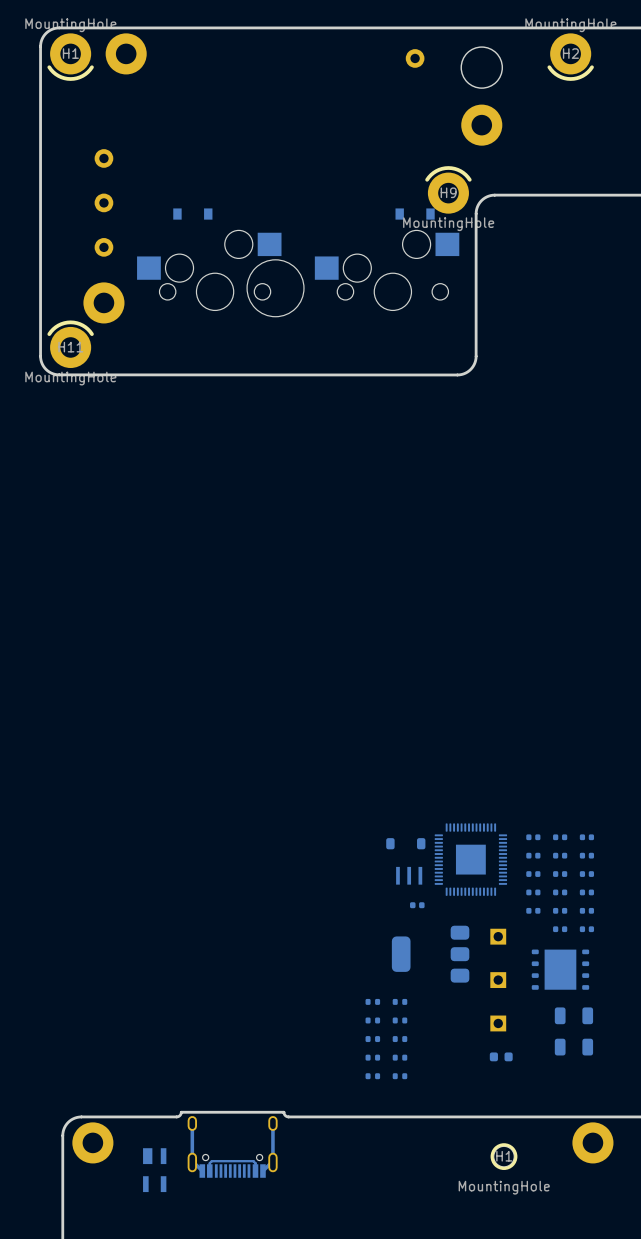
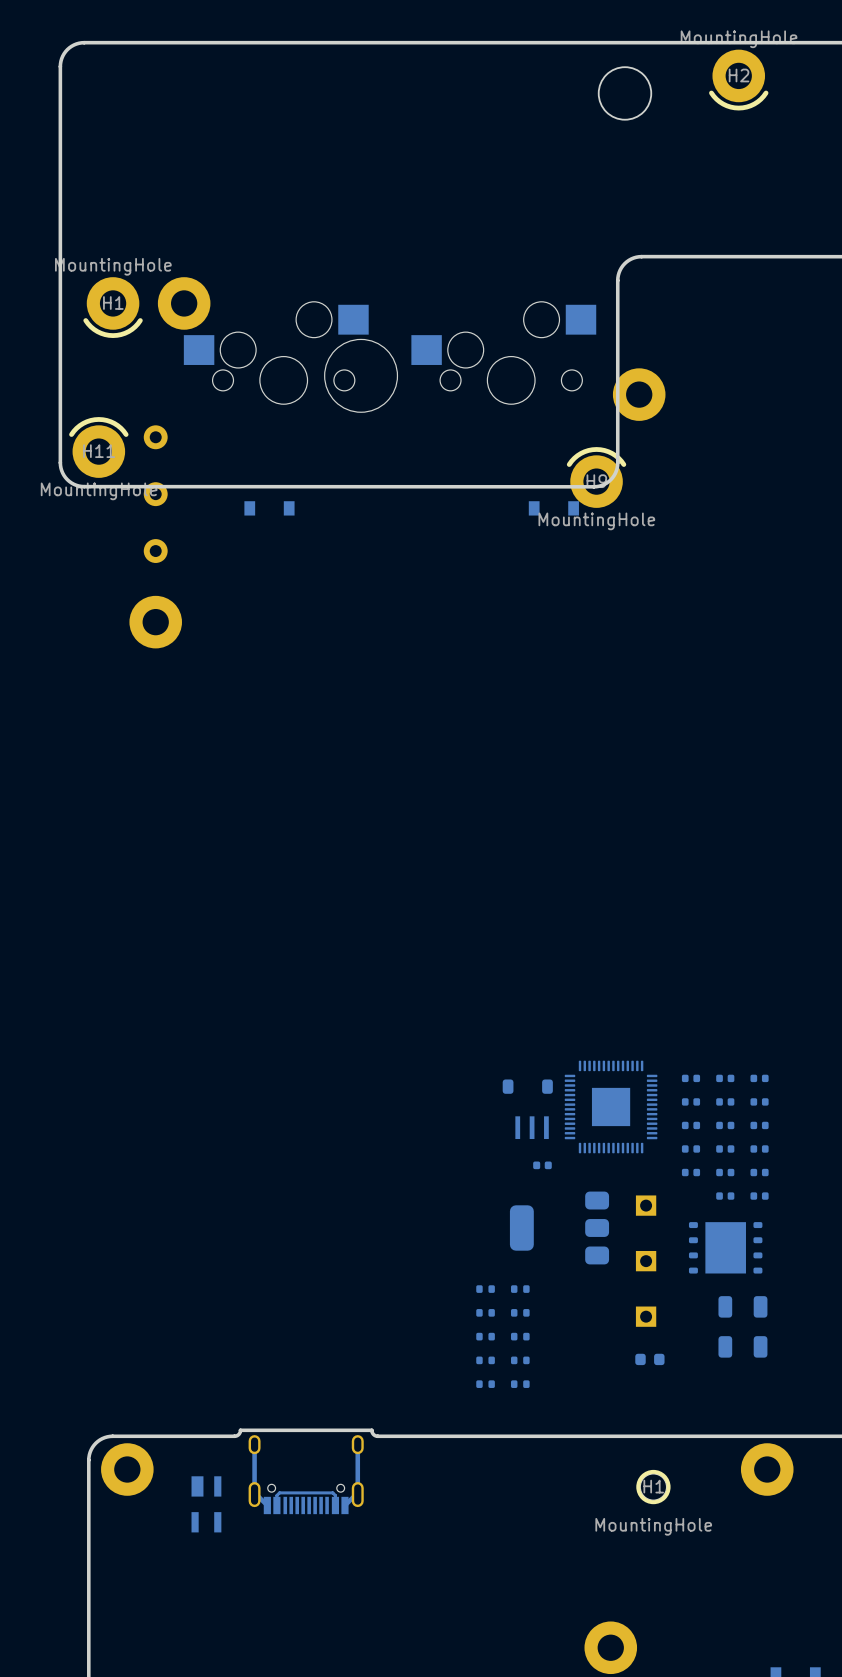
part: (126, 53) -> none
H1 position: (70, 57) -> (113, 307)
part: (415, 58) -> none
part position: (481, 125) -> (639, 394)
part: (103, 158) -> none
H9 position: (448, 189) -> (596, 477)
part: (103, 202) -> none
part: (192, 214) -> none
part: (415, 214) -> none
part: (103, 247) -> none
part position: (103, 302) -> (184, 303)
part: none -> (155, 437)
part: none -> (155, 494)
part: none -> (269, 508)
part: none -> (553, 508)
part: none -> (155, 551)
part: none -> (155, 622)

